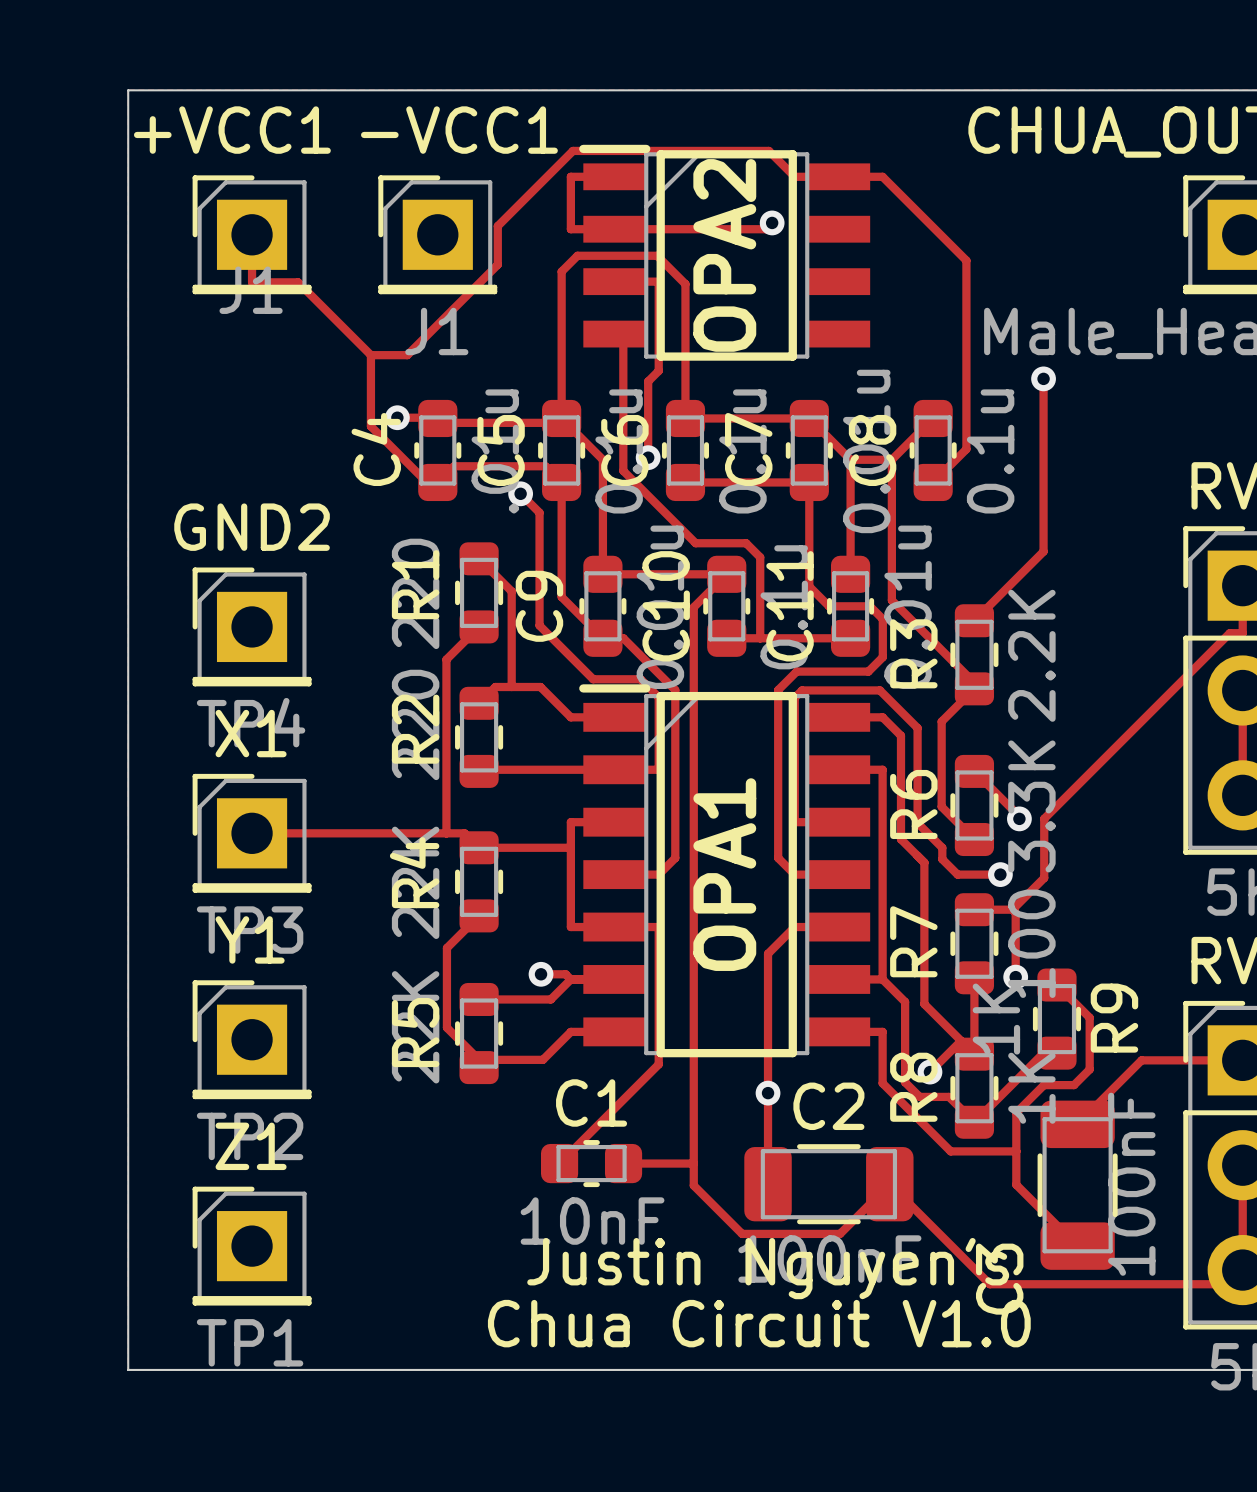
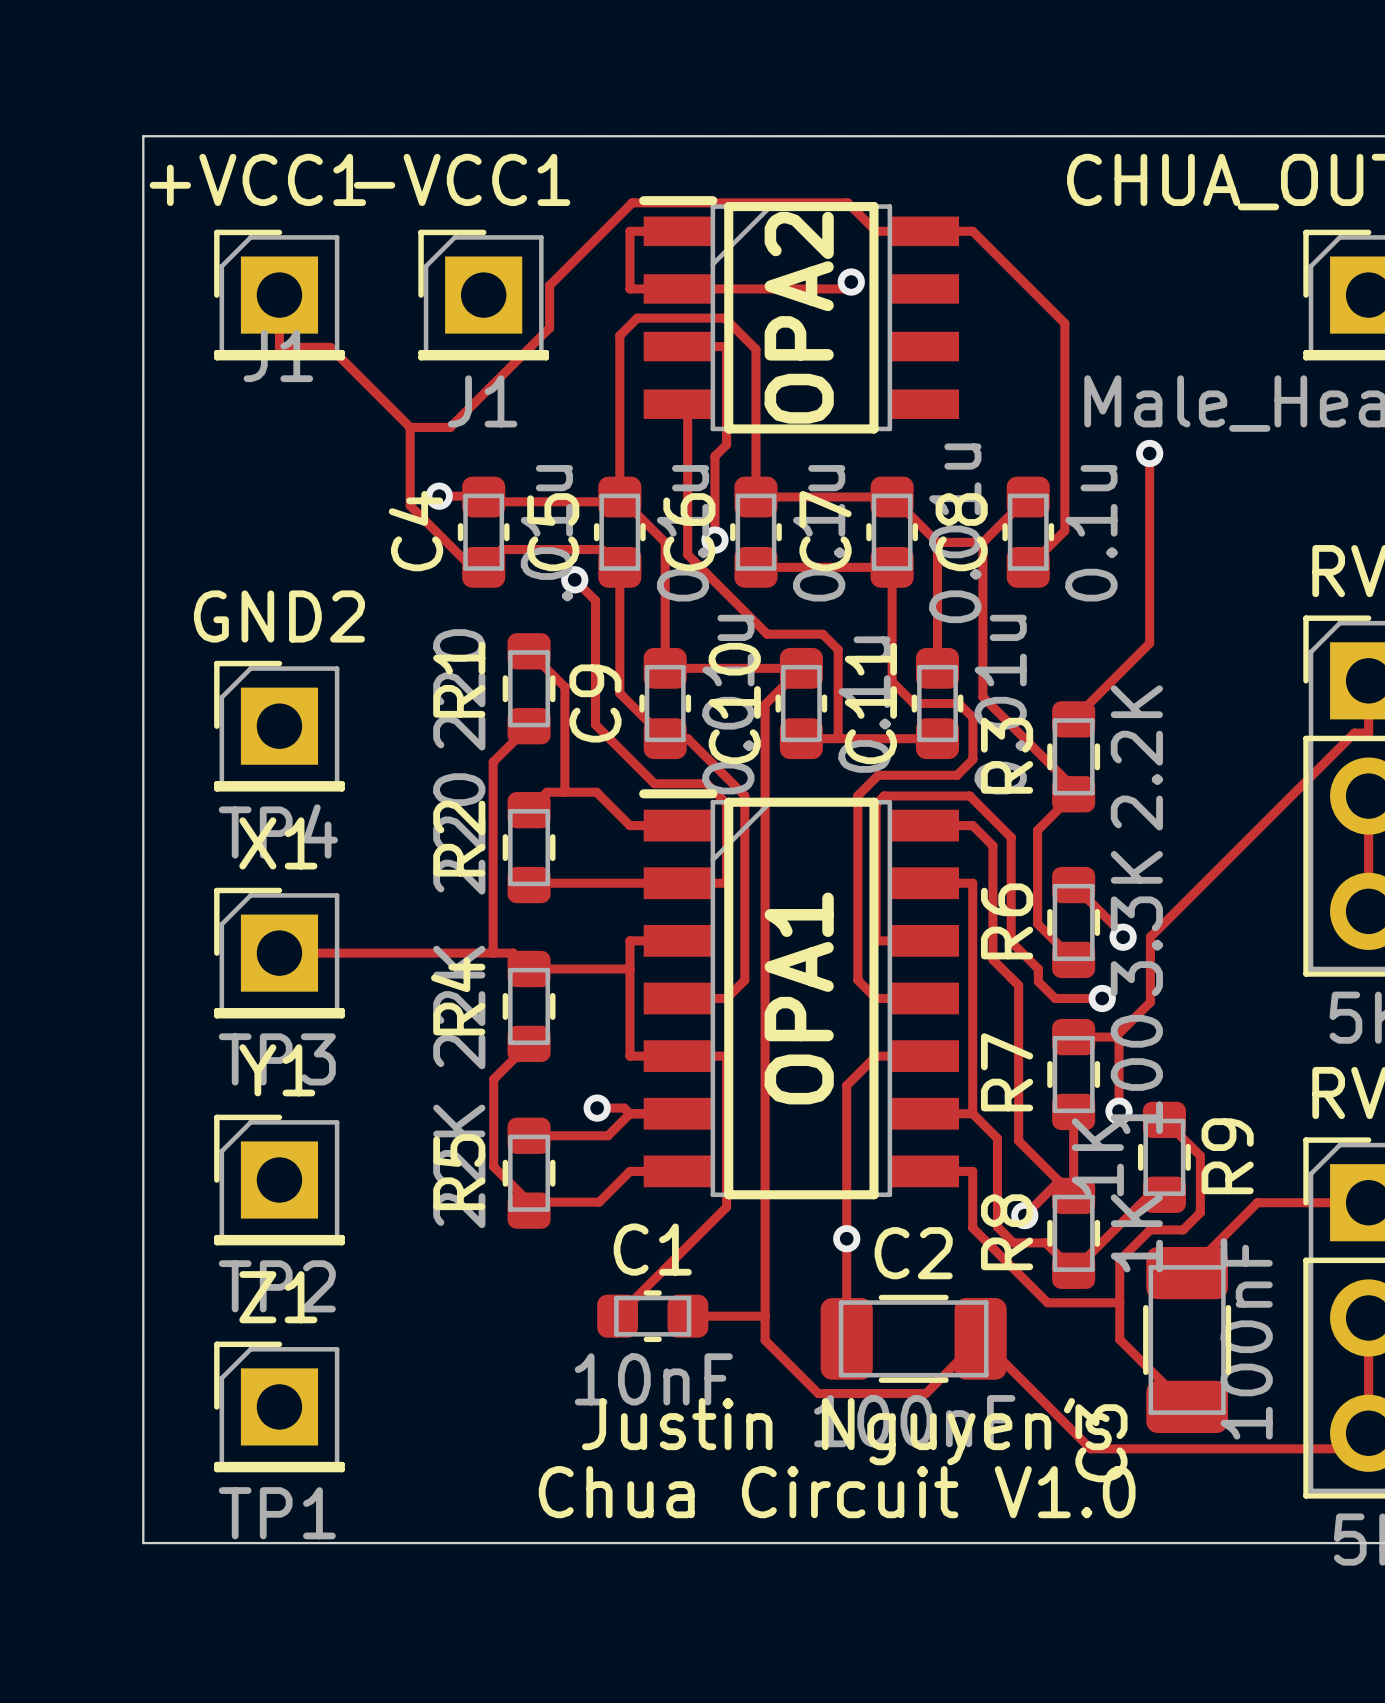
-VCC1 name position: -VCC1 (459, 130) -> -VCC1 (462, 179)

